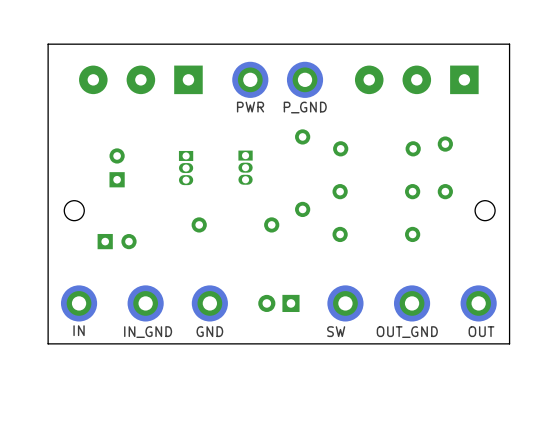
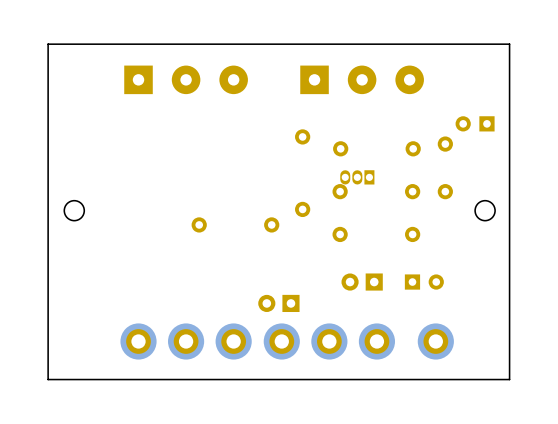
part rotation: 0° (140, 79) -> 180° (186, 79)
part: PWR (250, 79) -> none
part: P_GND (305, 79) -> none
part rotation: 0° (416, 79) -> 180° (362, 79)
part: none -> (475, 123)
part: (117, 167) -> none
part: (245, 167) -> none
part: (186, 168) -> none
part: none -> (357, 177)
part: (117, 241) -> none
part: none -> (362, 282)
part: none -> (424, 282)
part: IN (79, 303) -> none
part: IN_GND (145, 303) -> none
part: GND (209, 303) -> none
part: SW (345, 303) -> none
part: OUT_GND (412, 303) -> none
part: OUT (478, 303) -> none
part: none -> (138, 341)
part: none -> (186, 341)
part: none -> (233, 341)
part: none -> (281, 341)
part: none -> (329, 341)
part: none -> (376, 341)
part: none -> (435, 341)
board edge: (509, 343) (48, 343) -> (509, 343) (509, 379) (48, 379) (48, 343)

